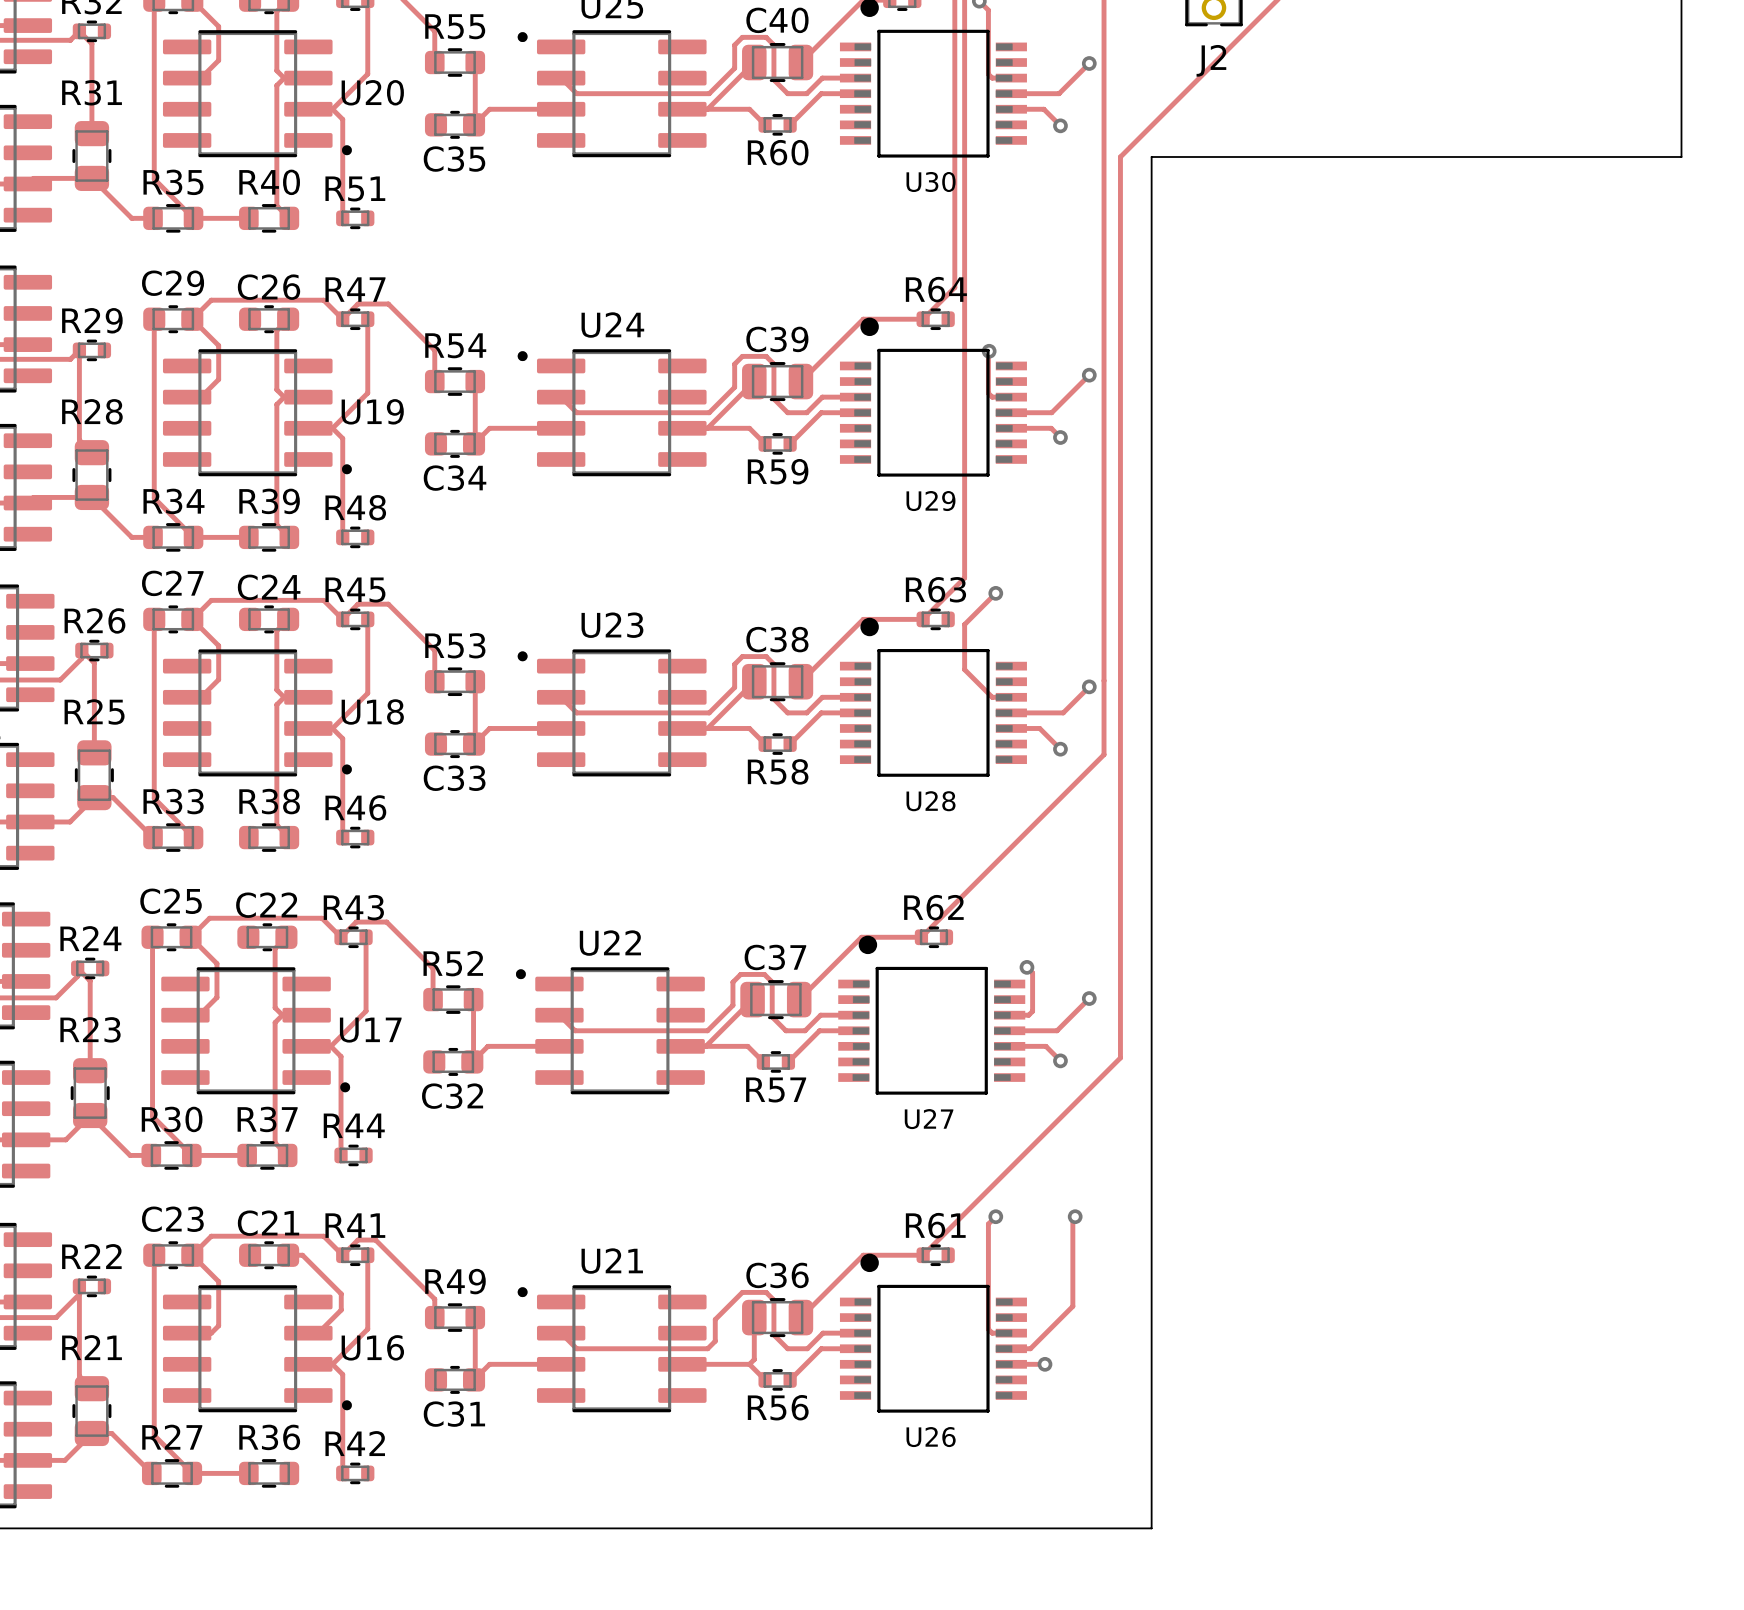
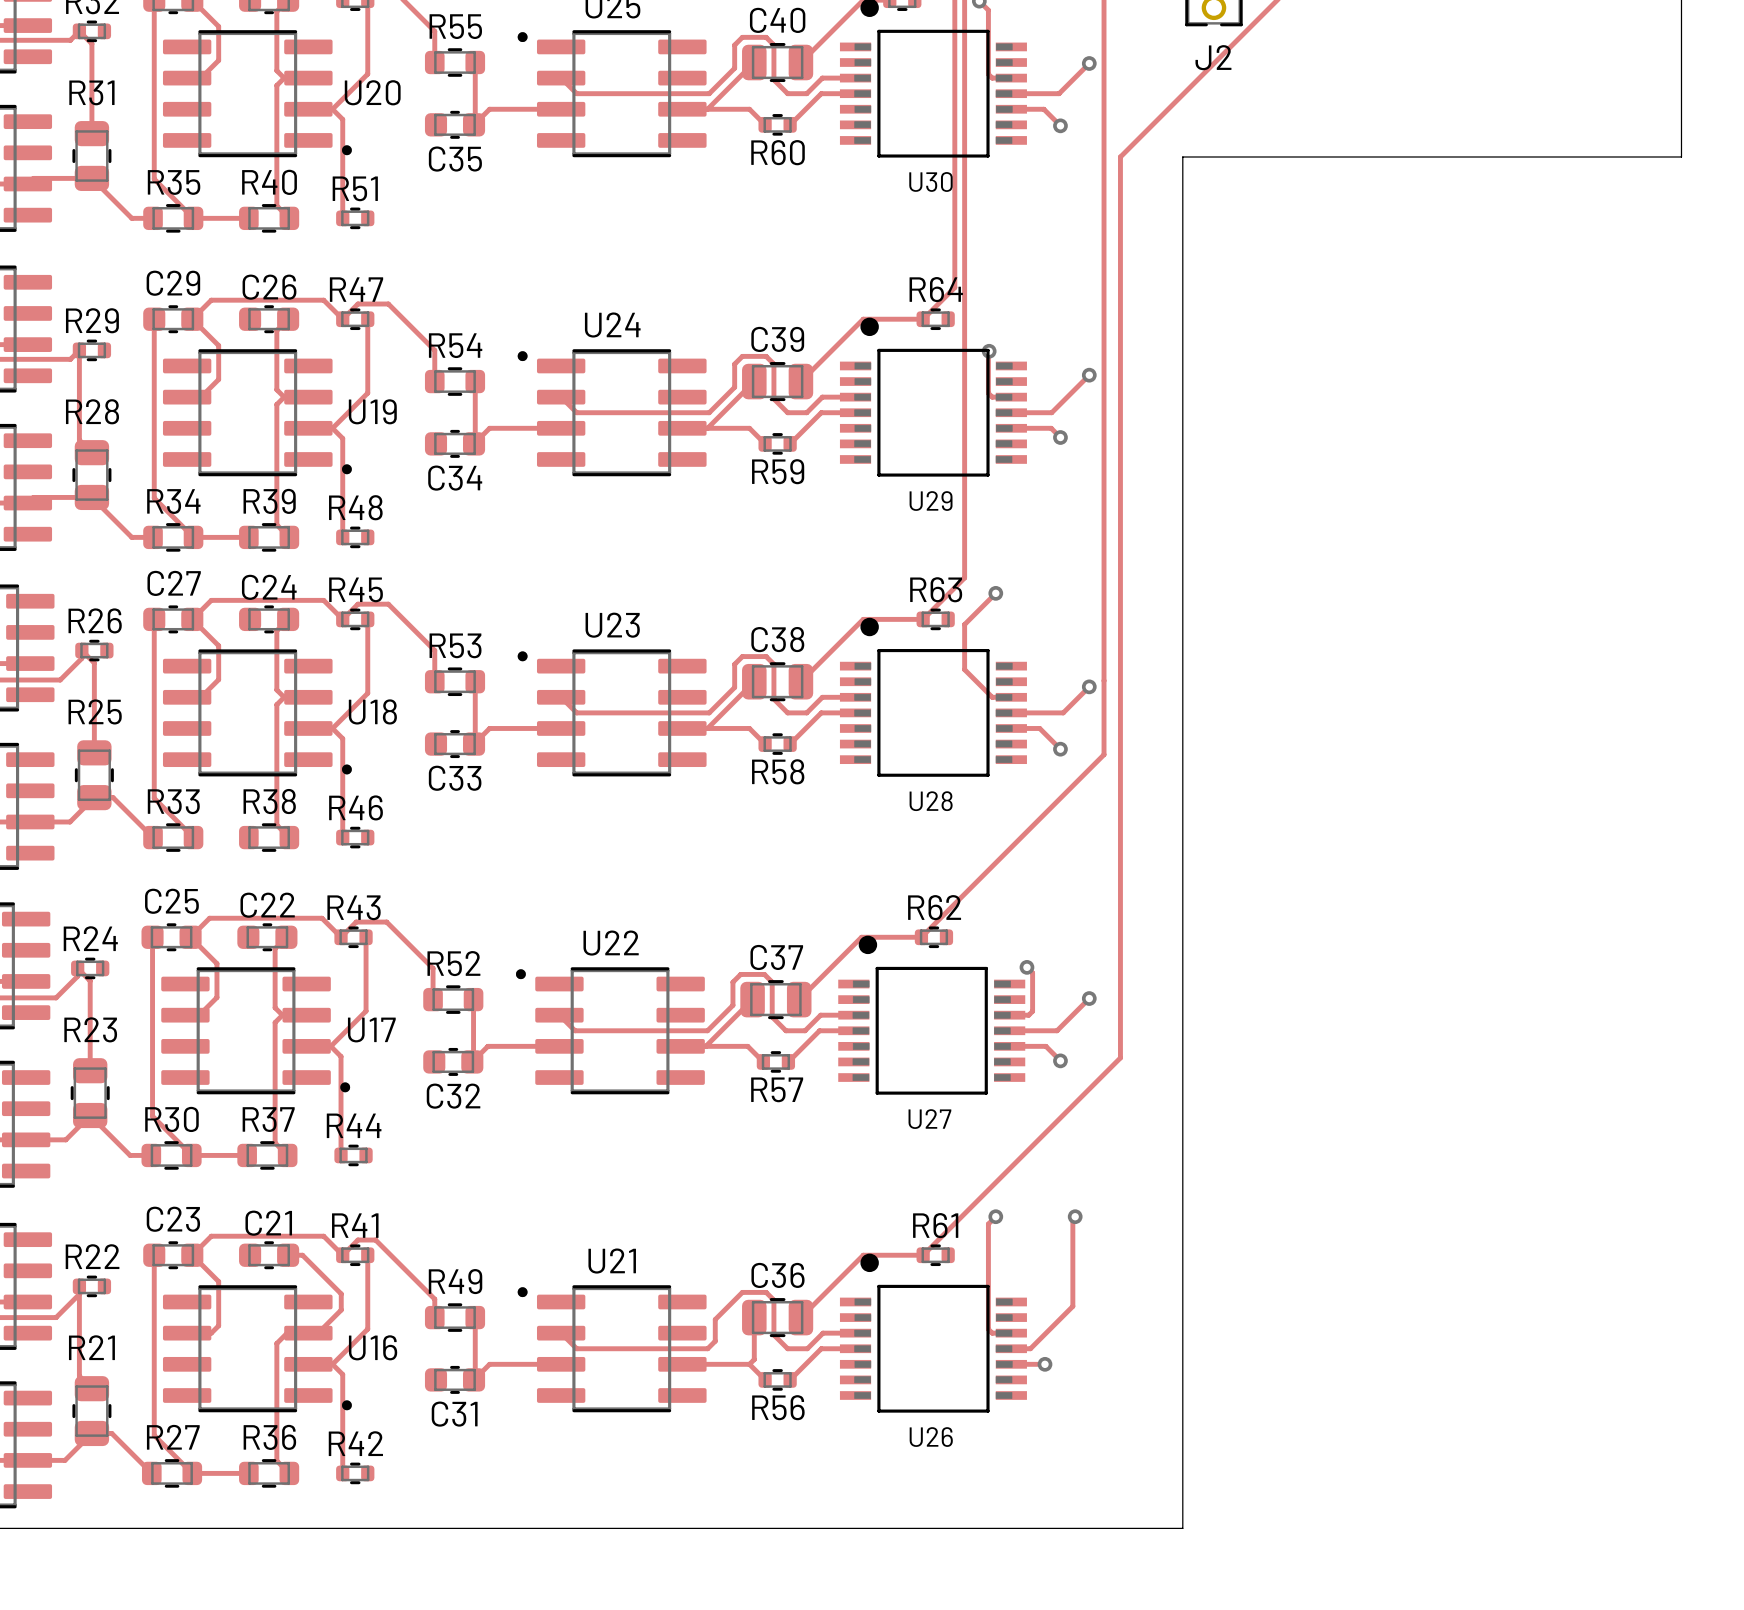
board edge: (1182, 156) (1151, 156) (1151, 1528) -> (1182, 156) (1182, 1528) (1151, 1528)
track: none -> (308, 1333) (287, 1333) (276, 1343) (276, 1460) (289, 1473)

